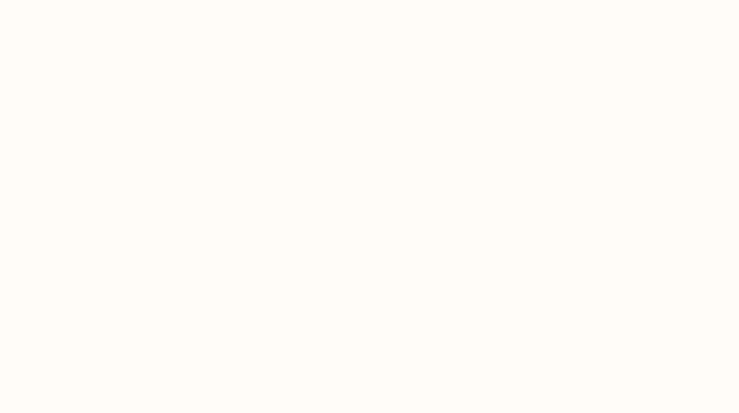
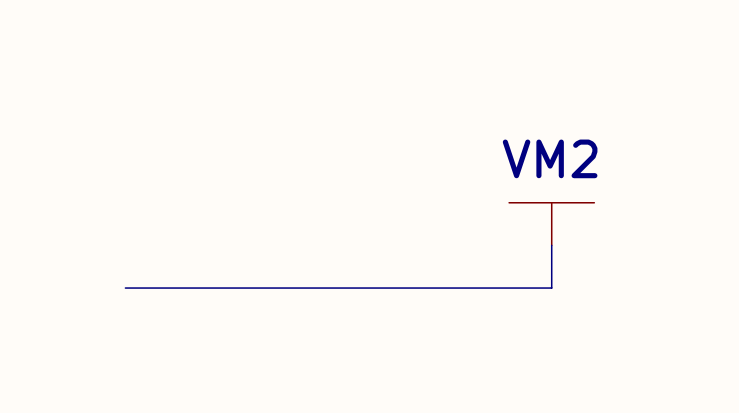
power symbol: none -> VM2 (551, 224)
wire: none -> (551, 245) (551, 288) (125, 288)

